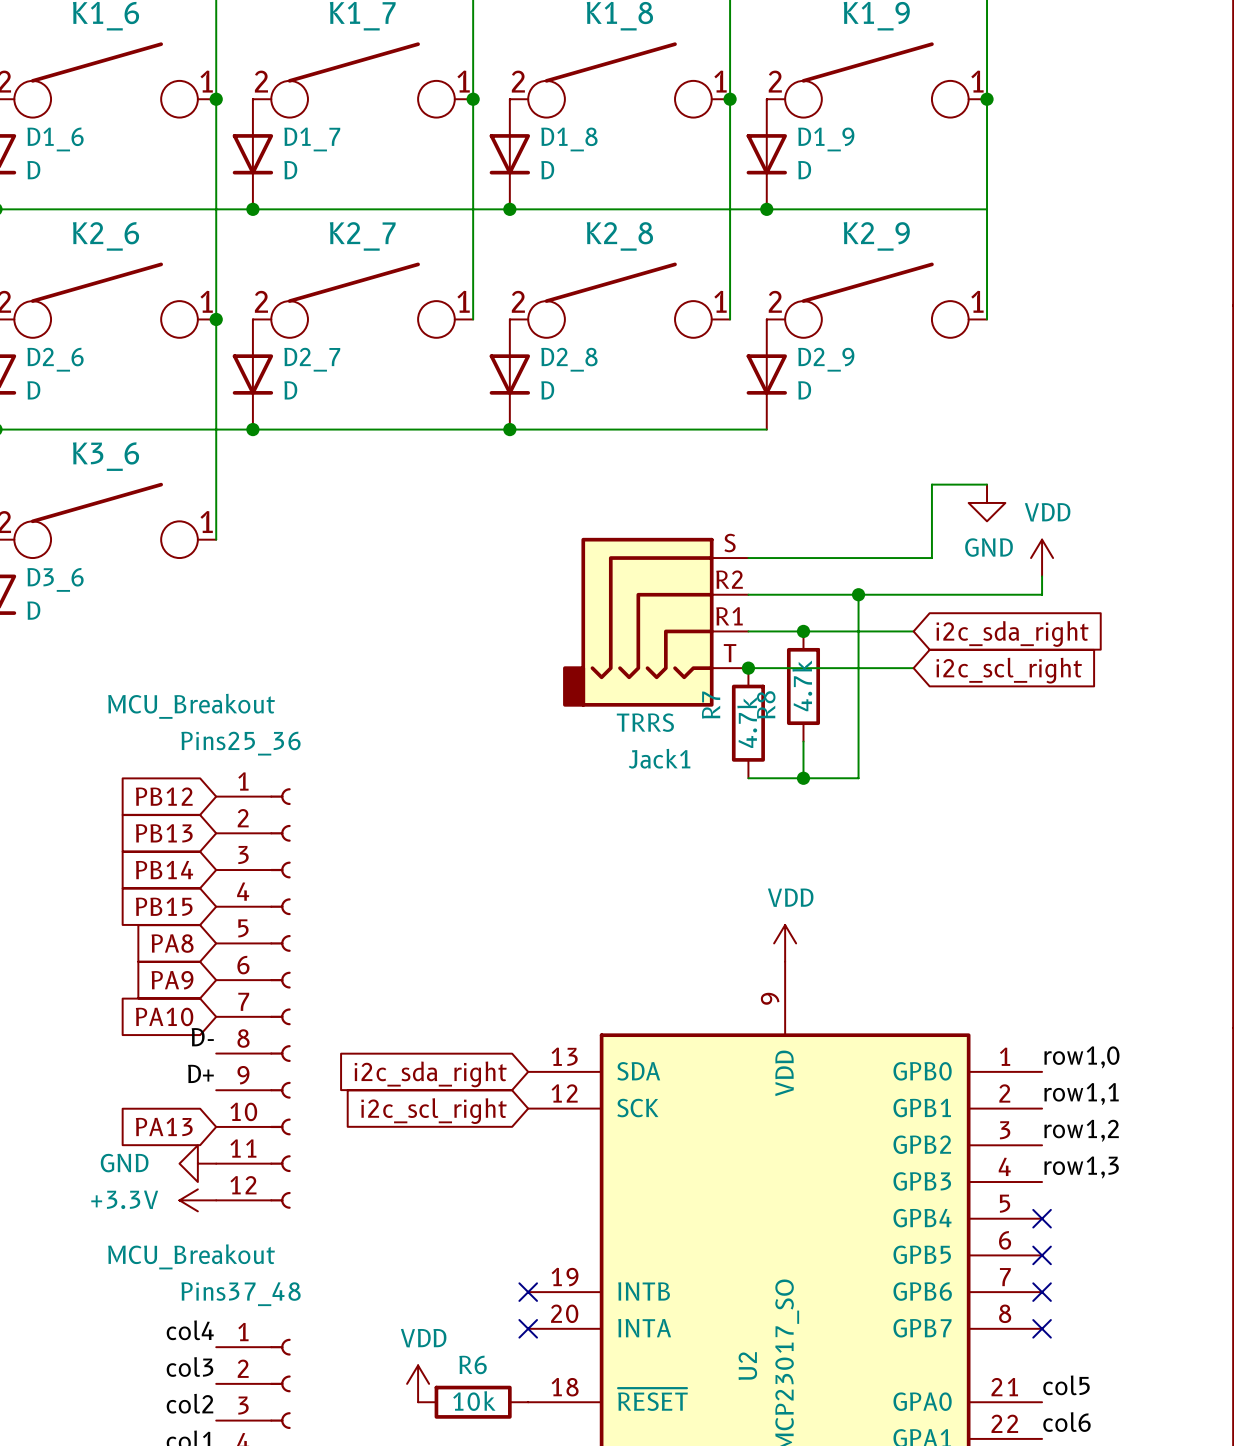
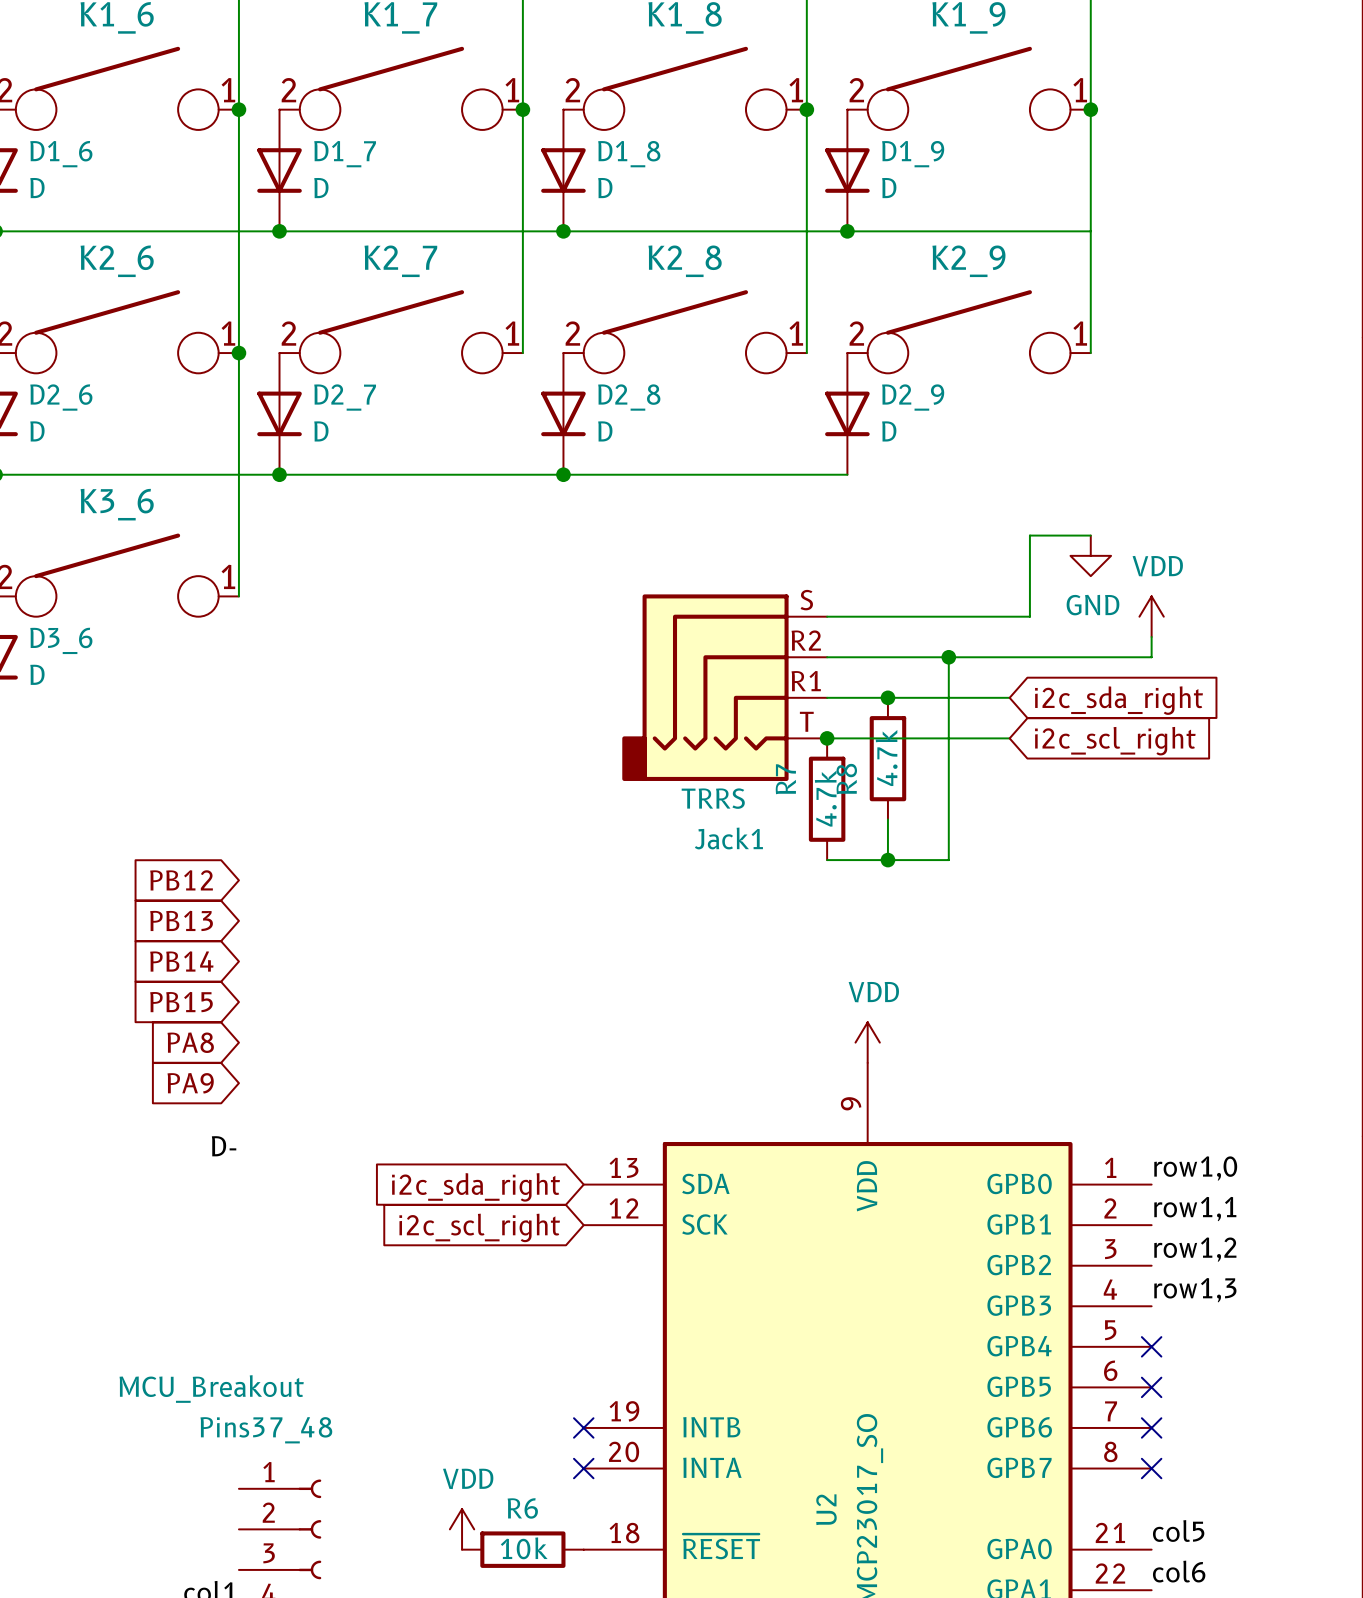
Pins25_36: MCU_Breakout (253, 998) -> none
global label: PA10 (164, 1016) -> none
label: D+ (200, 1073) -> none
global label: PA13 (164, 1126) -> none
power symbol: GND (197, 1163) -> none
power symbol: +3.3V (197, 1200) -> none
label: col4 (190, 1330) -> none
label: col3 (190, 1367) -> none
label: col2 (189, 1403) -> none

